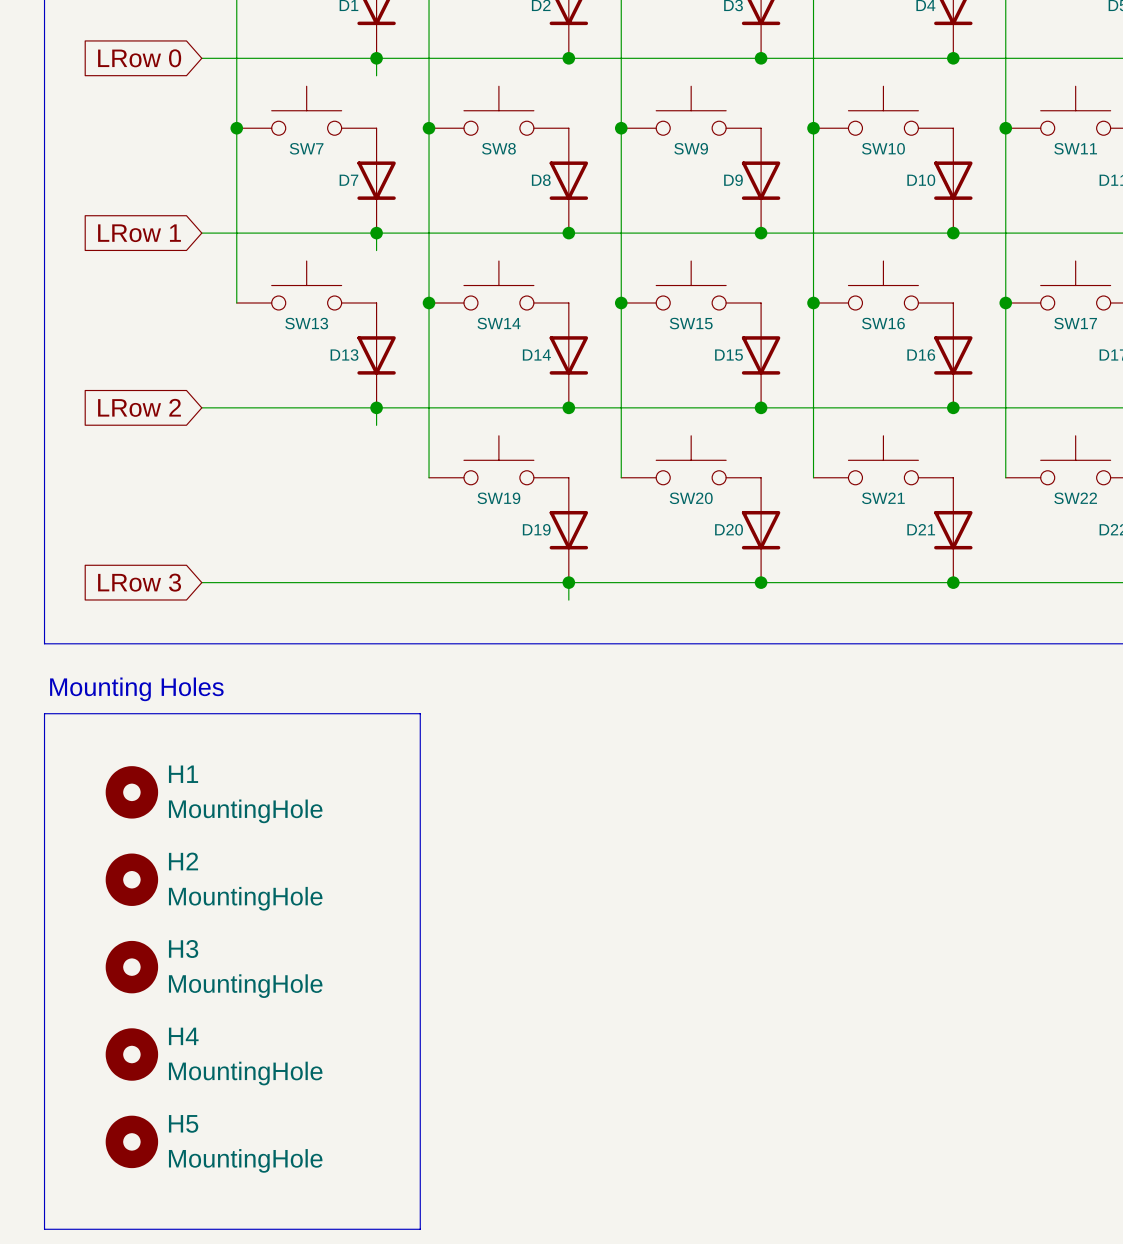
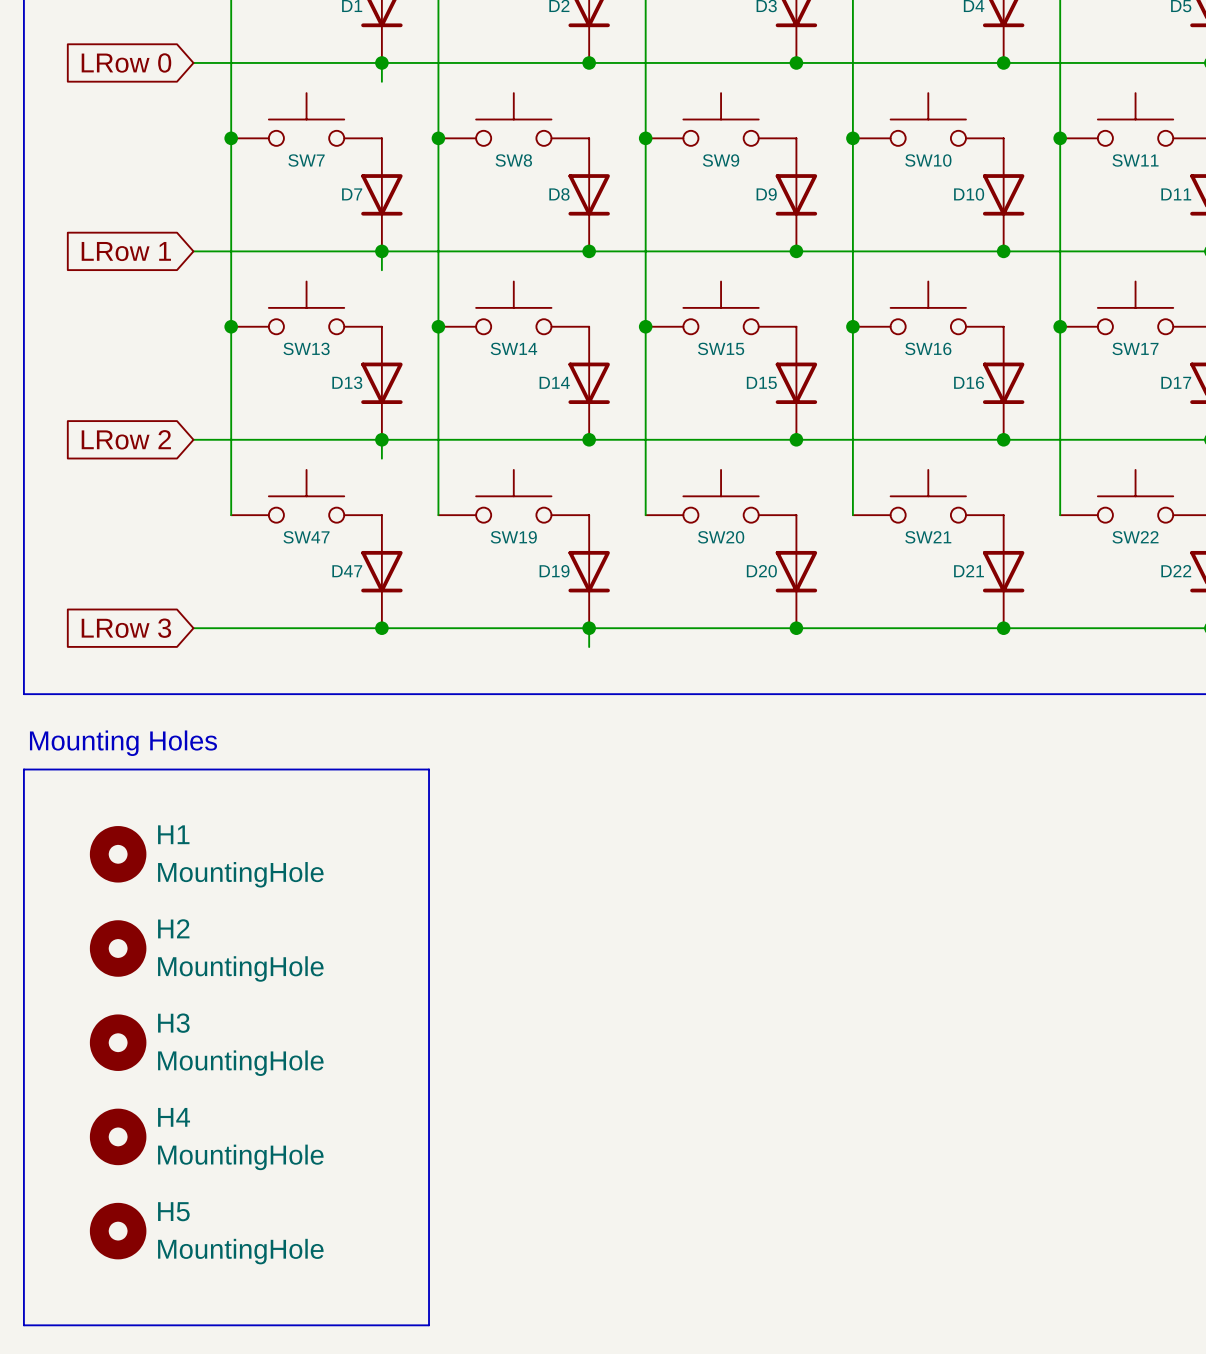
wire: none -> (231, 326) (231, 515)
junction: none -> (231, 326)
SW47: none -> (306, 496)
D47: none -> (381, 571)
junction: none -> (381, 628)

